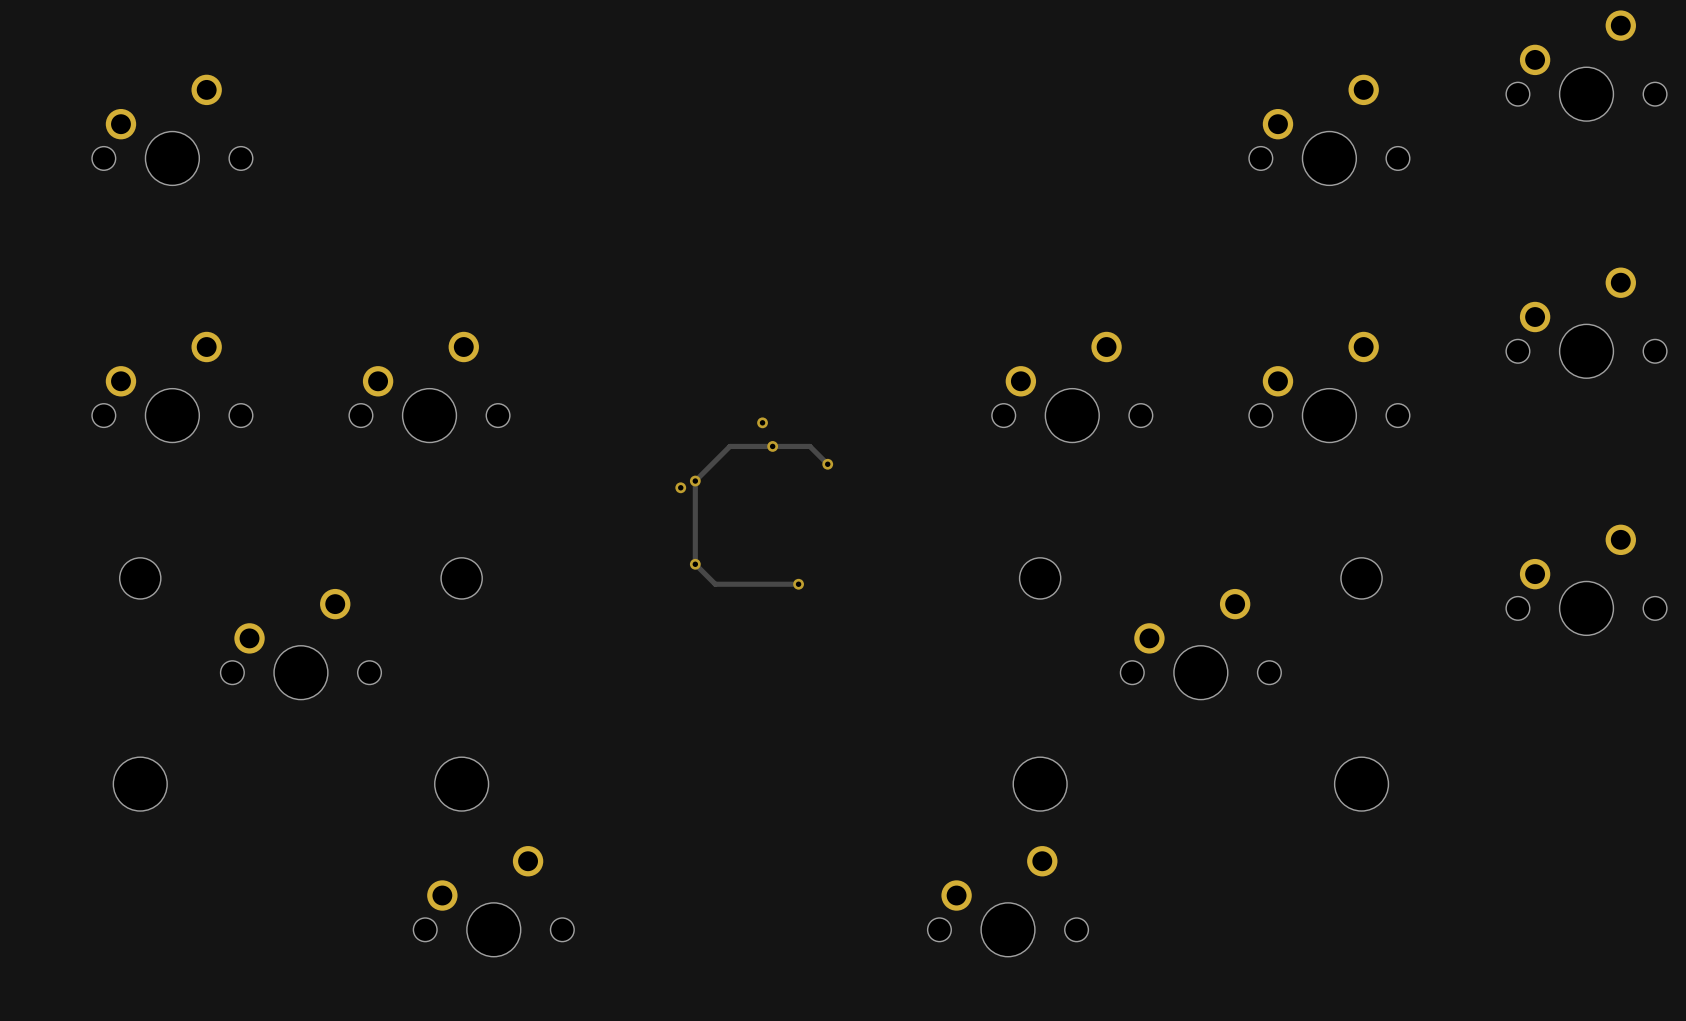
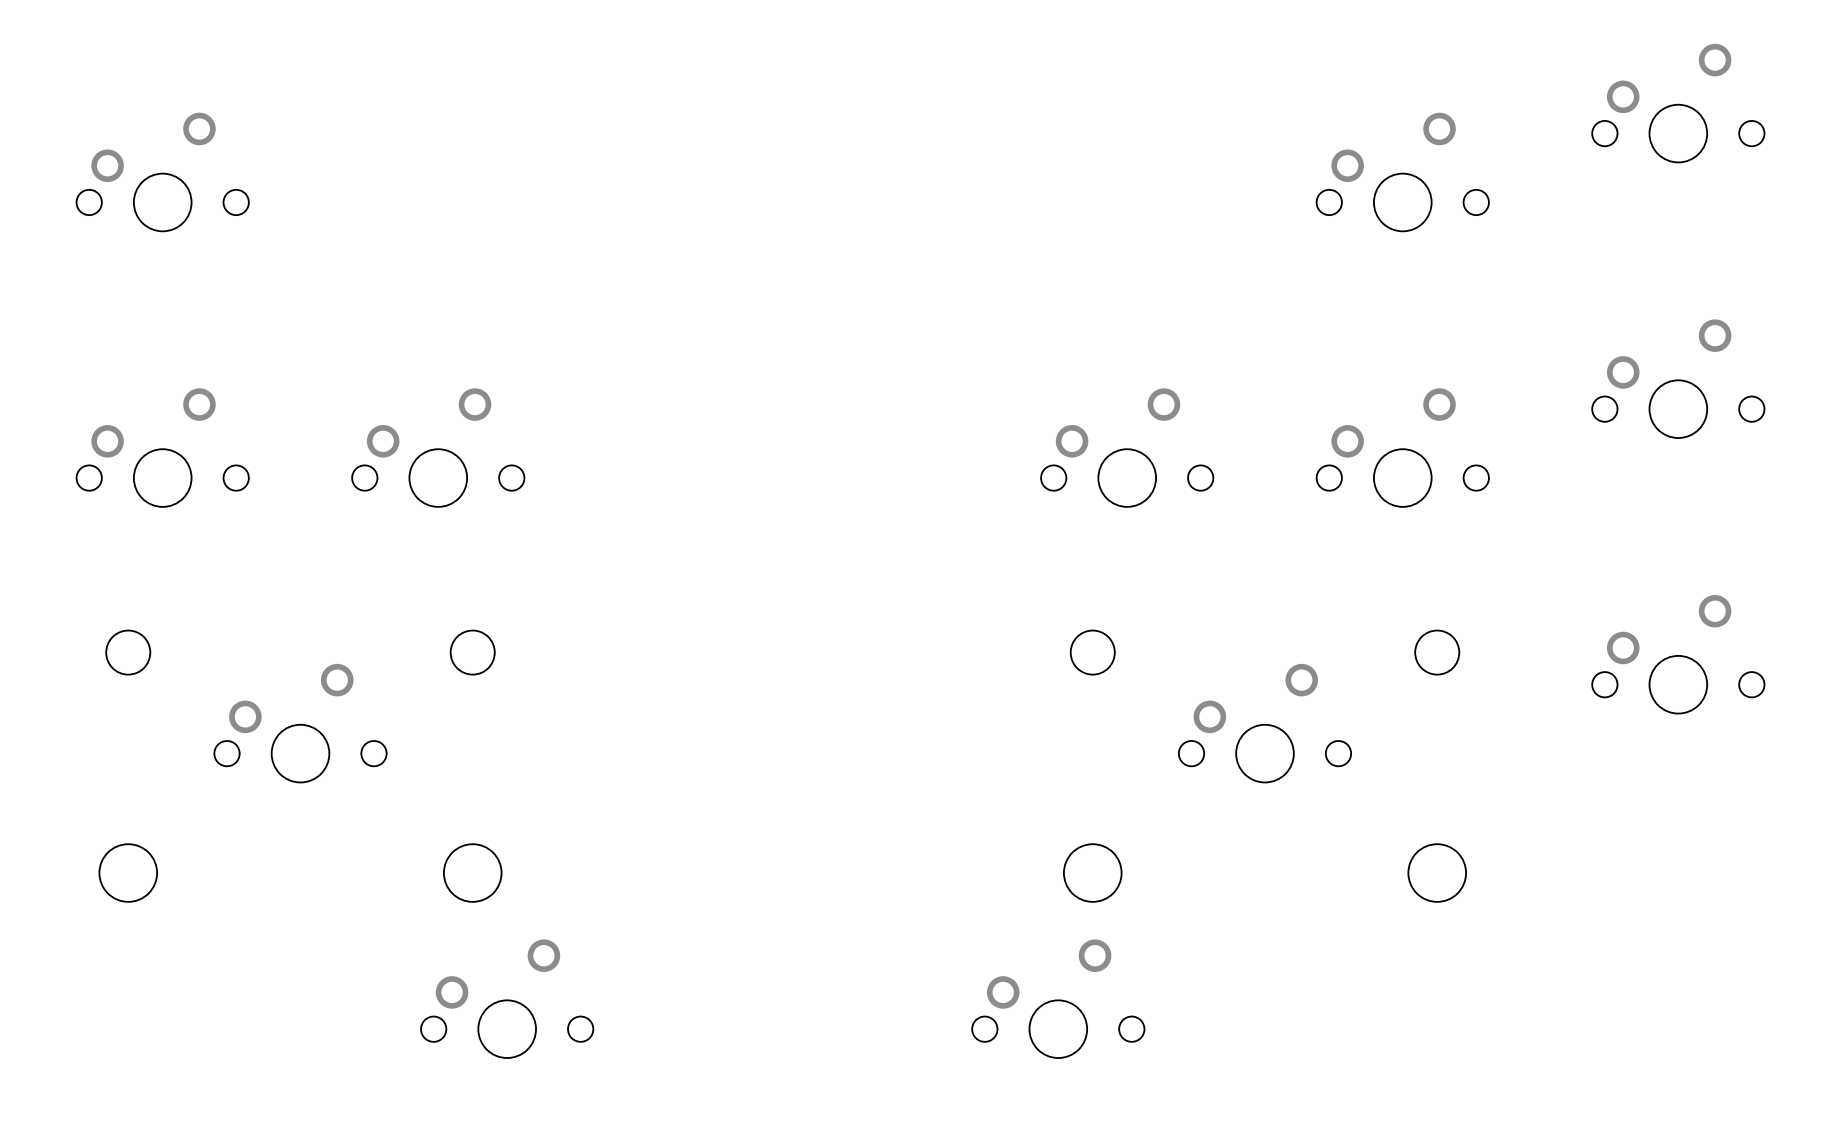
via: (762, 422) -> none
via: (772, 446) -> none
track: (827, 464) (809, 446) (729, 446) (695, 481) (695, 564) (715, 584) (798, 584) -> none
via: (827, 464) -> none
via: (695, 481) -> none
via: (680, 487) -> none
via: (695, 564) -> none
via: (798, 584) -> none

